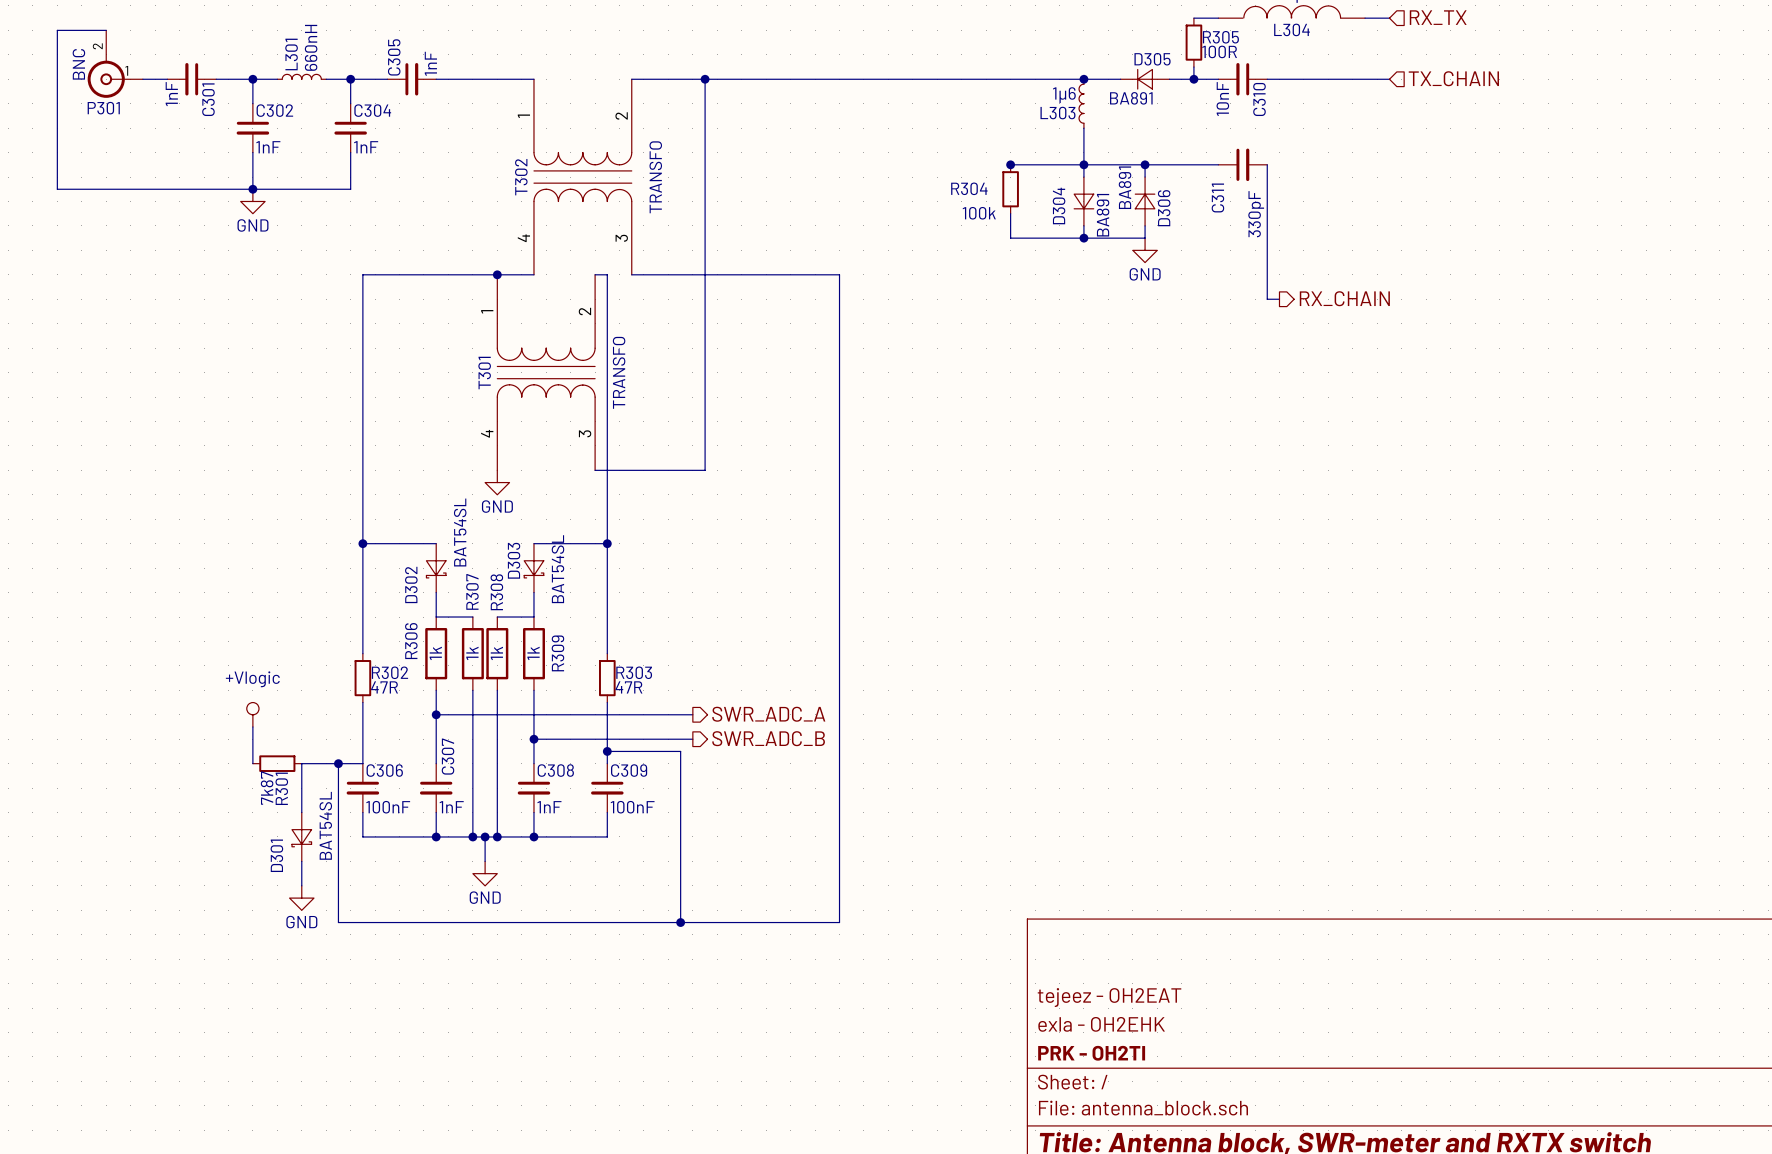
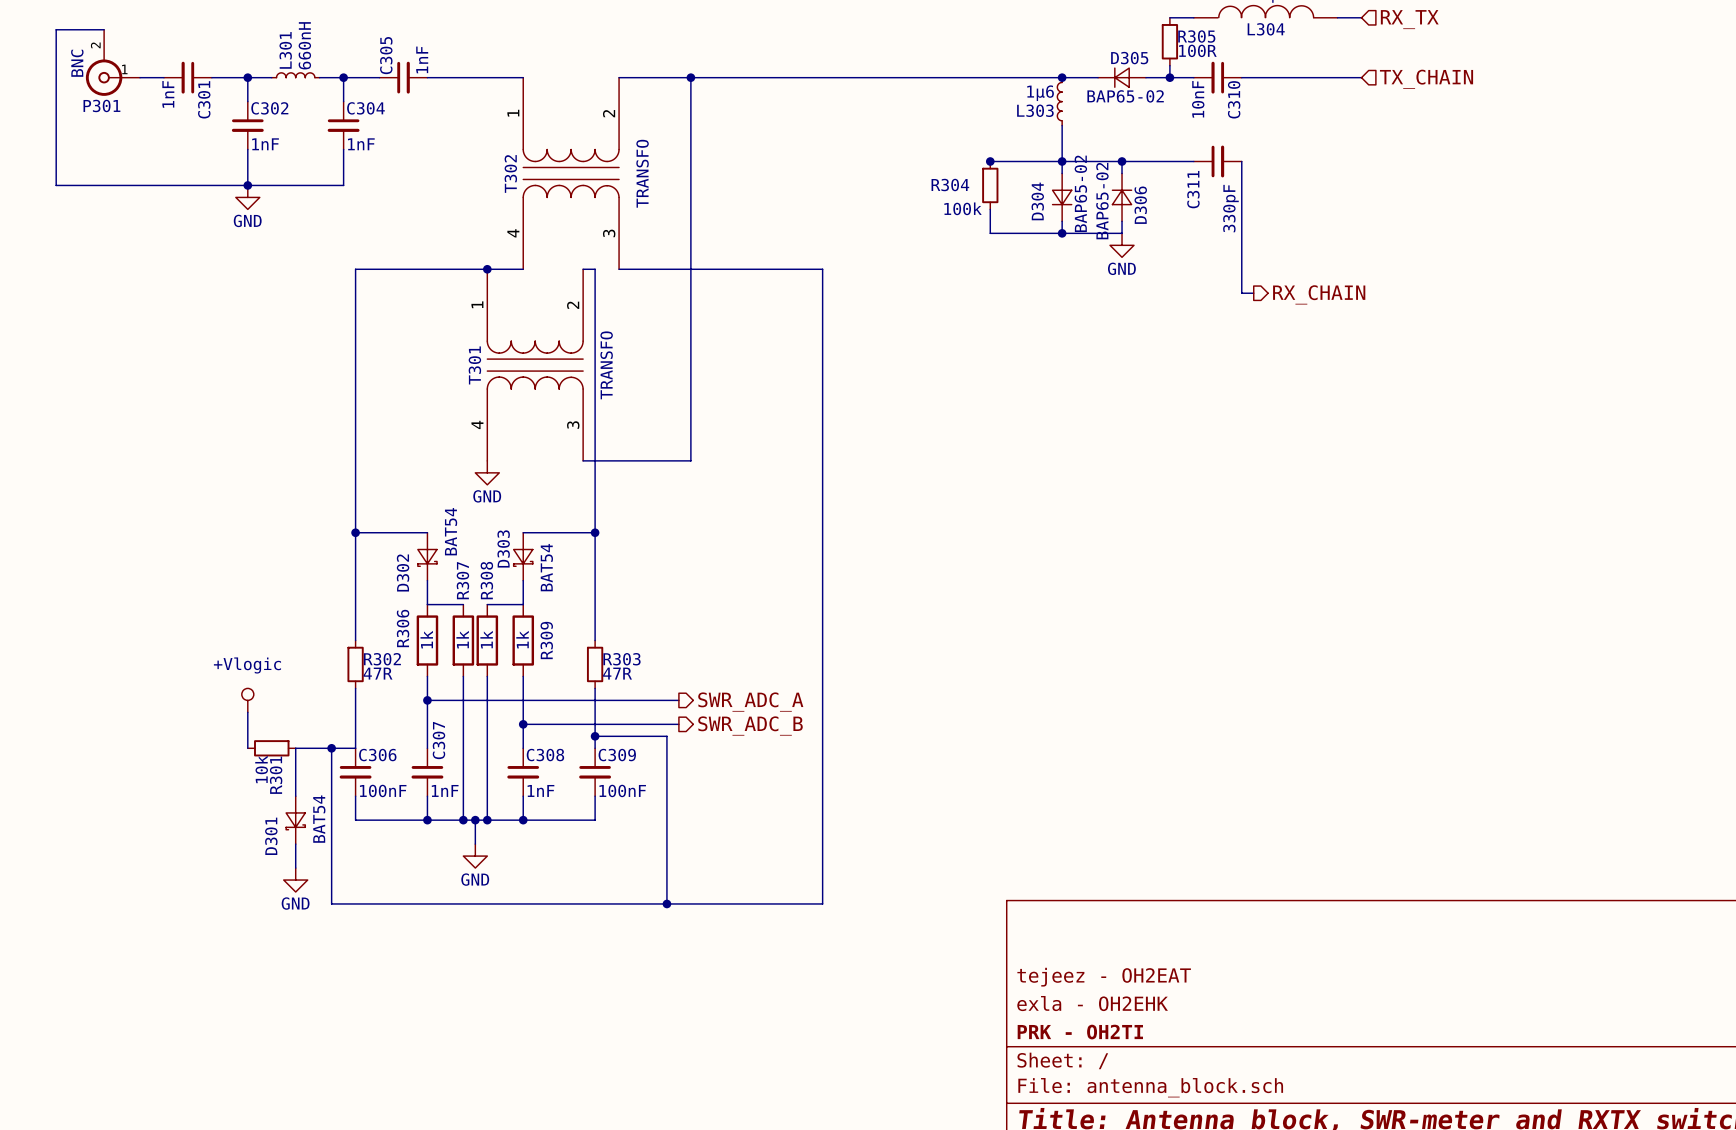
D305 value: BA891 (1131, 98) -> BAP65-02 (1125, 96)
D306 value: BA891 (1125, 187) -> BAP65-02 (1102, 201)
D304 value: BA891 (1103, 215) -> BAP65-02 (1080, 193)
D302 value: BAT54SL (460, 532) -> BAT54 (451, 531)
D303 value: BAT54SL (557, 569) -> BAT54 (546, 567)
R301 value: 7k87 (267, 788) -> 10k (261, 769)
D301 value: BAT54SL (325, 825) -> BAT54 (319, 819)

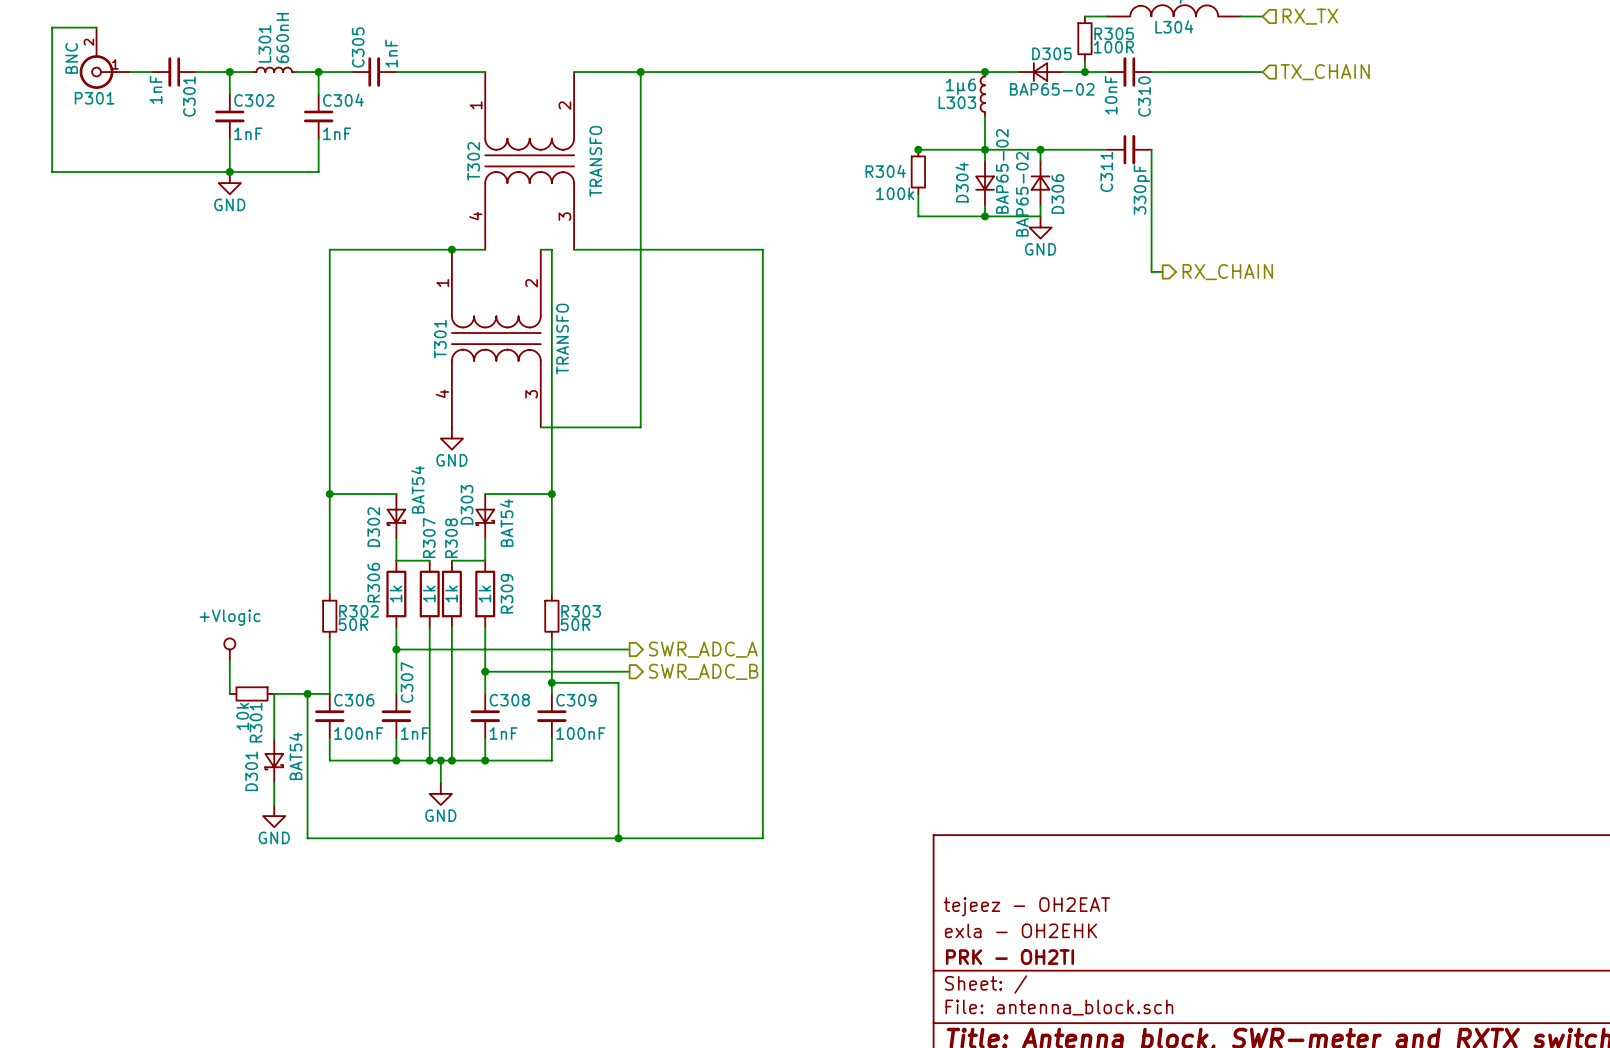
R302 value: 47R (378, 673) -> 50R (353, 624)
R303 value: 47R (617, 673) -> 50R (575, 624)

